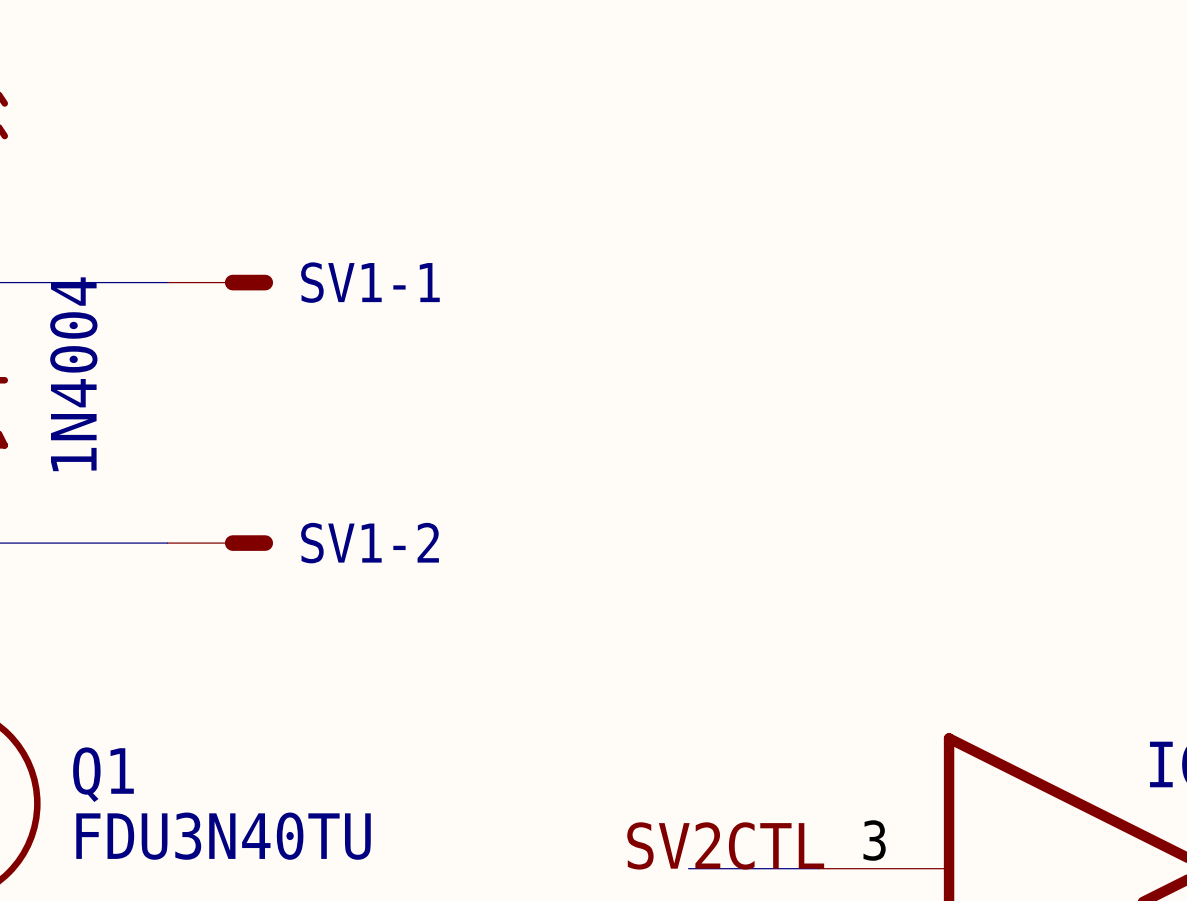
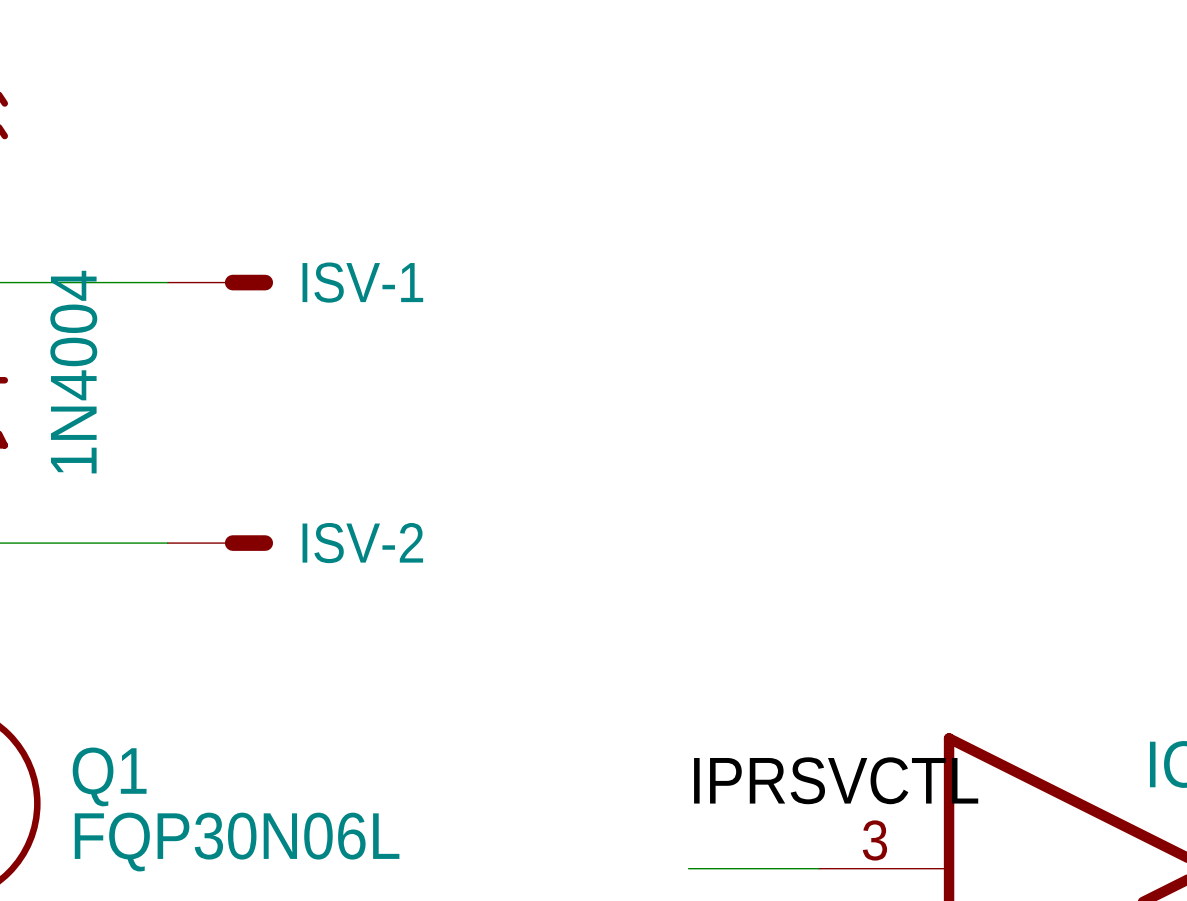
SV1-1 name: SV1-1 (370, 282) -> ISV-1 (362, 282)
SV1-2 name: SV1-2 (370, 543) -> ISV-2 (362, 543)
Q1 value: FDU3N40TU (223, 836) -> FQP30N06L (237, 842)
label: SV2CTL (725, 845) -> IPRSVCTL (836, 780)

